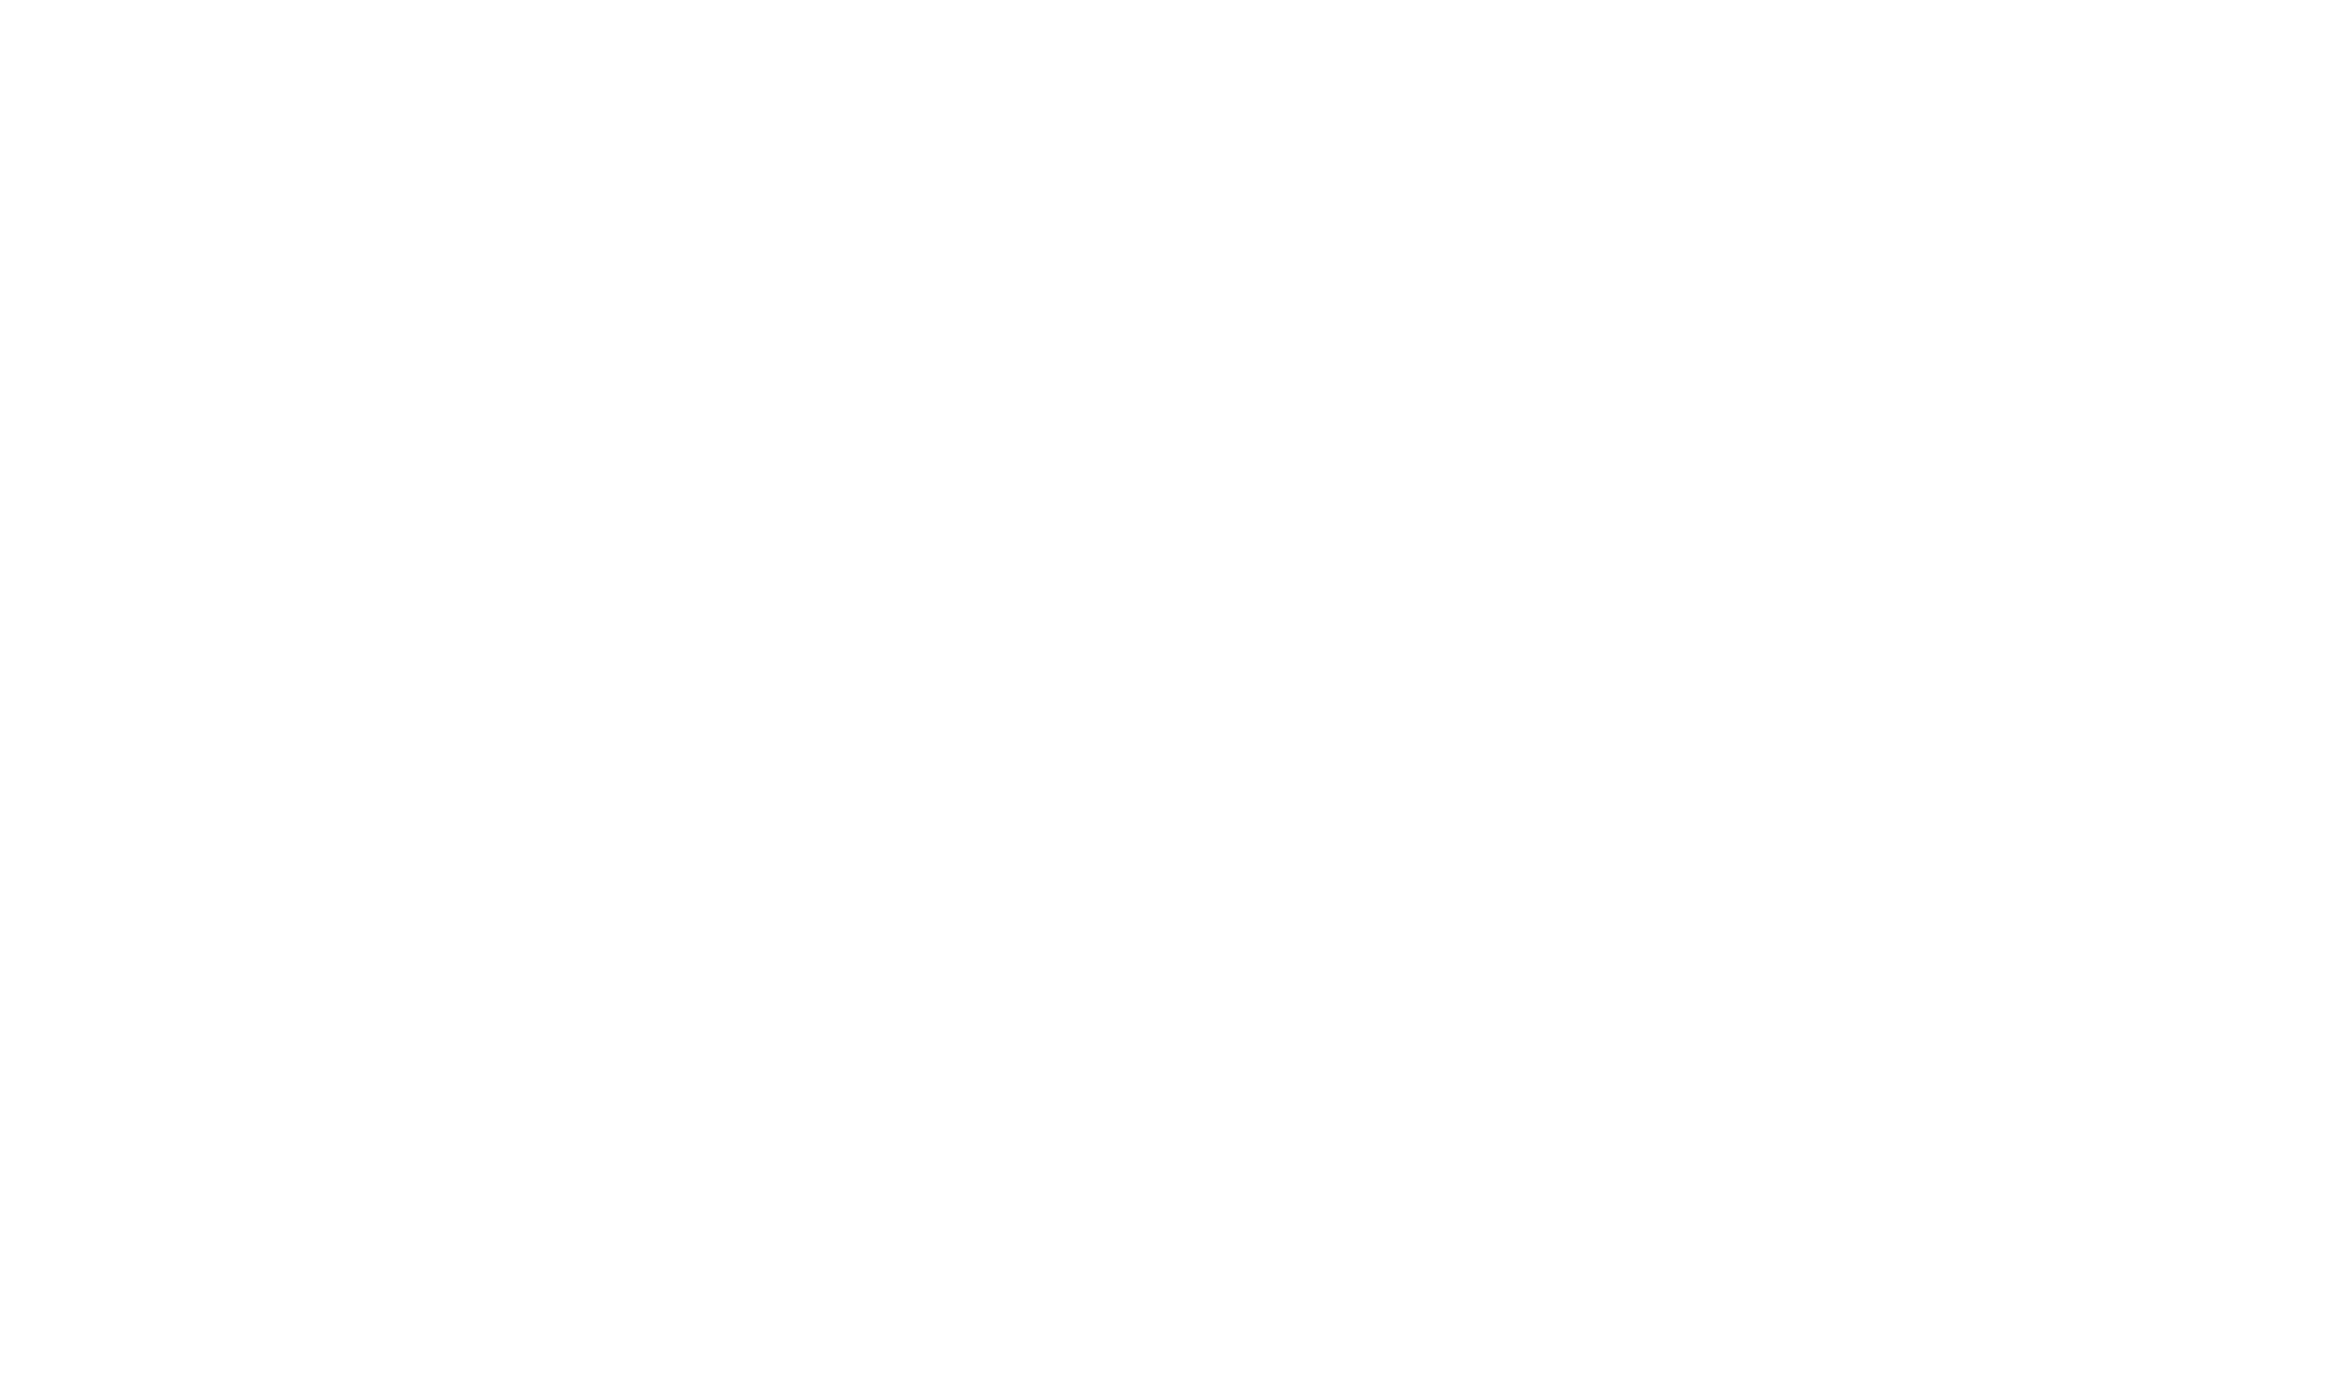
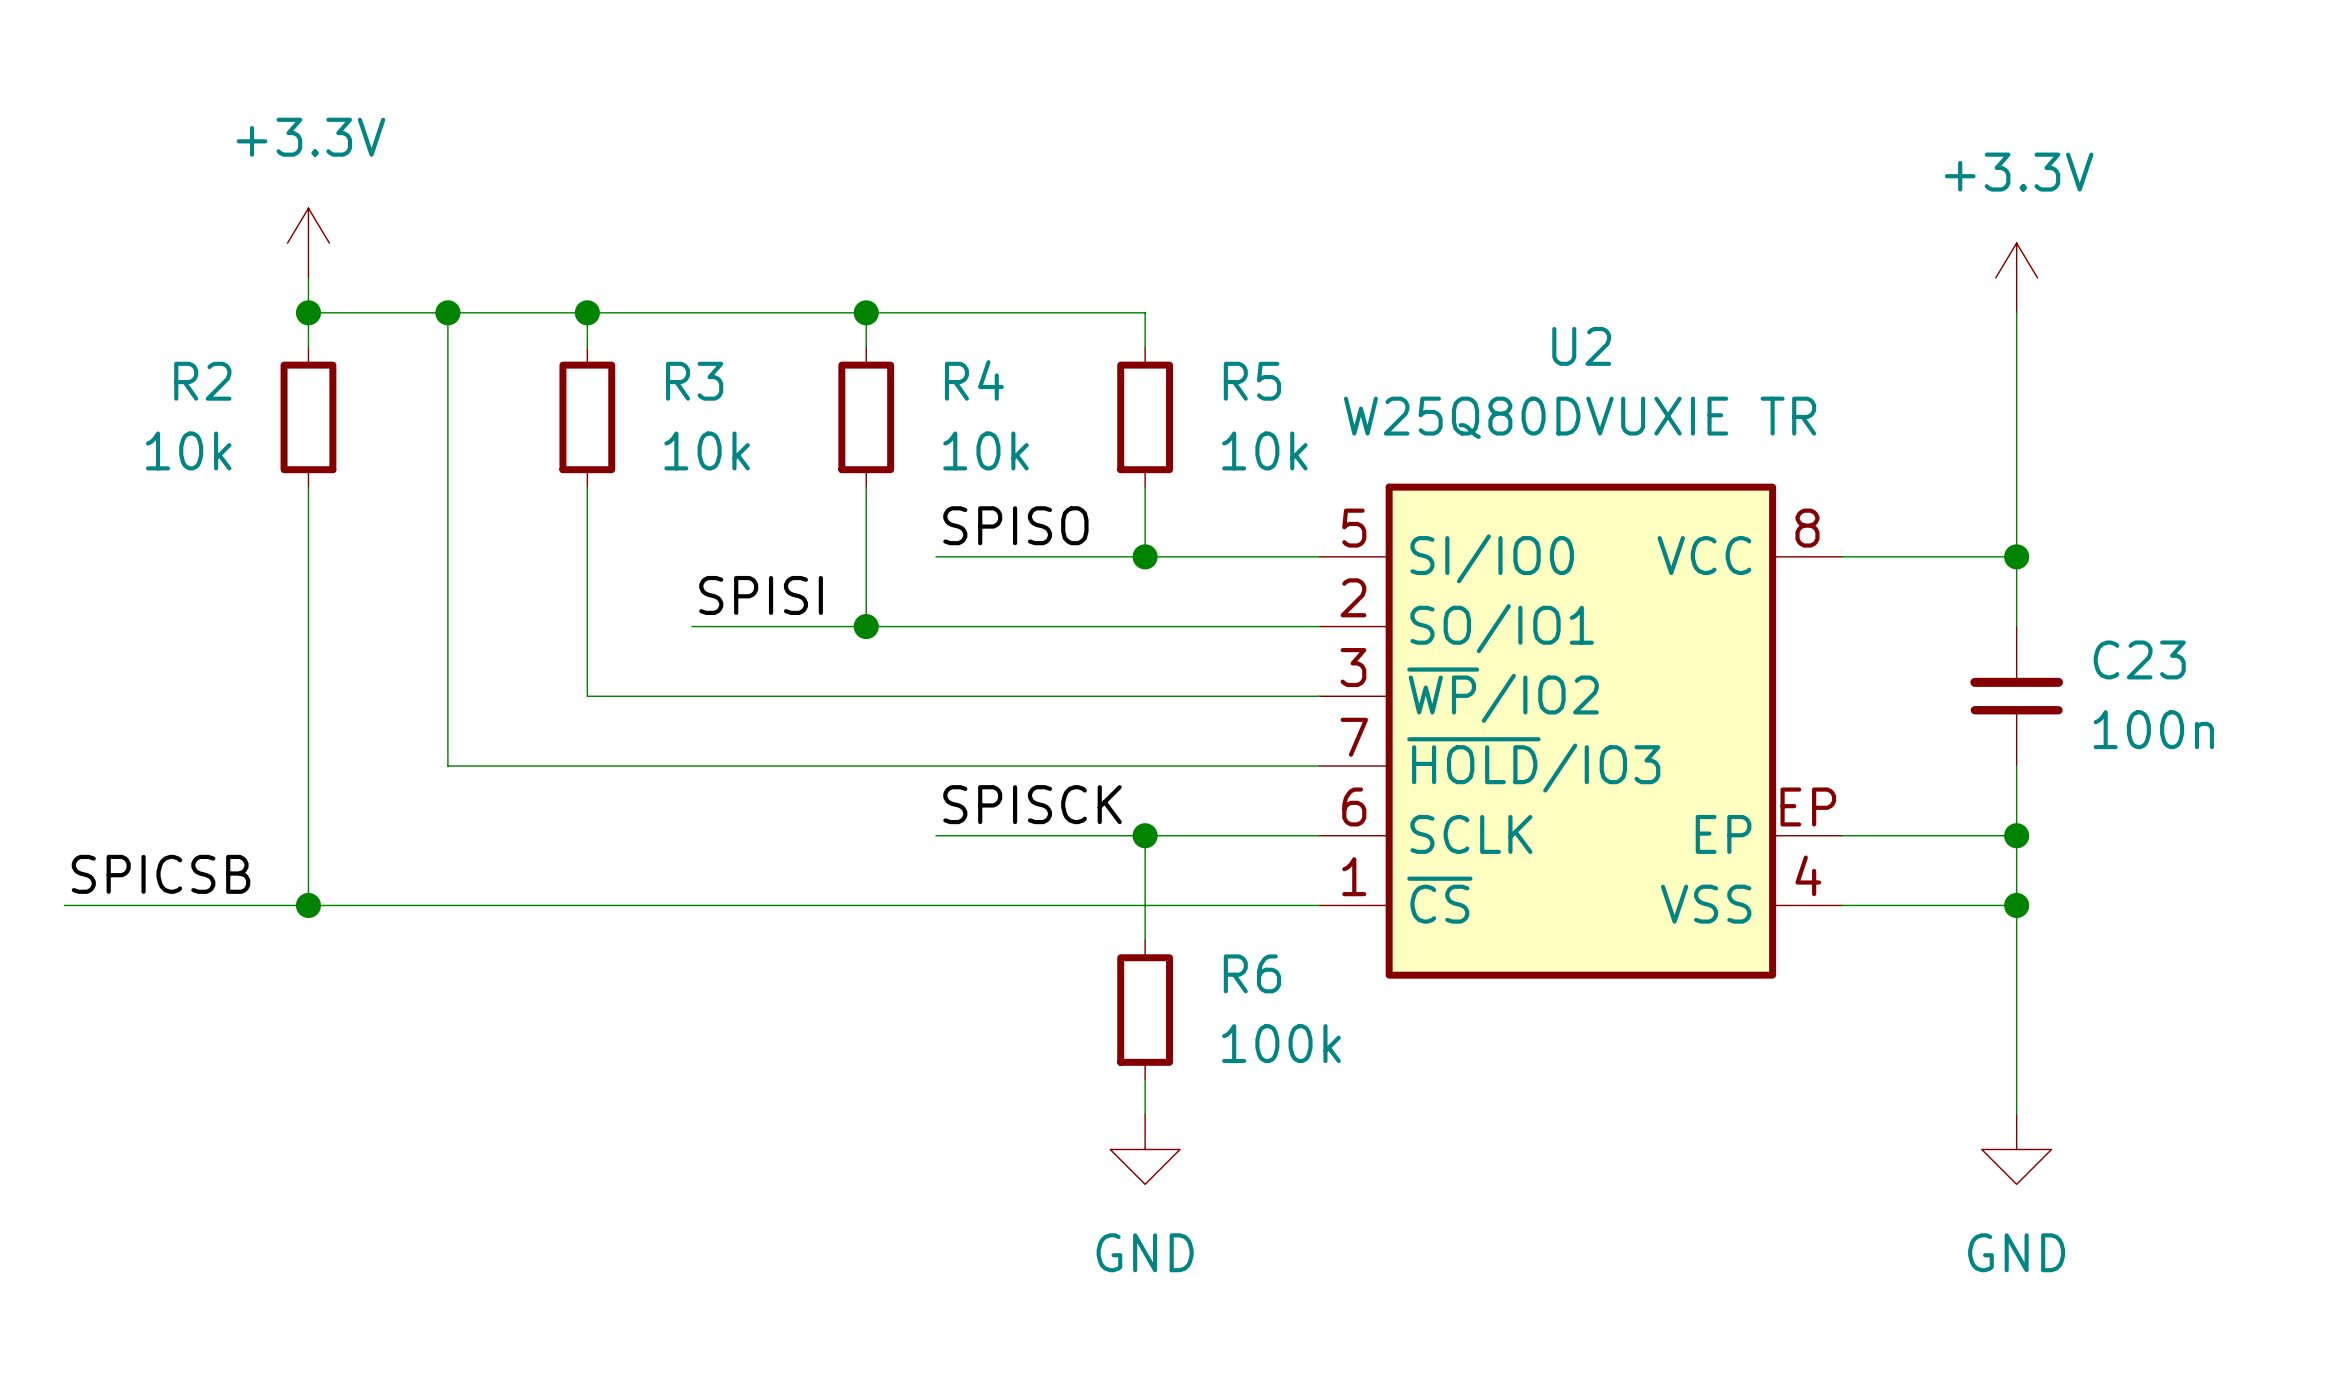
power symbol: none -> +3.3V (308, 243)
wire: none -> (308, 277) (308, 347)
power symbol: none -> +3.3V (2016, 277)
wire: none -> (308, 312) (1145, 312) (1145, 347)
junction: none -> (308, 312)
wire: none -> (447, 312) (447, 766) (1319, 766)
junction: none -> (447, 312)
wire: none -> (587, 312) (587, 347)
junction: none -> (587, 312)
wire: none -> (866, 312) (866, 347)
junction: none -> (866, 312)
wire: none -> (2016, 312) (2016, 626)
R2: none -> (308, 417)
R3: none -> (587, 417)
R4: none -> (866, 417)
R5: none -> (1145, 417)
wire: none -> (308, 487) (308, 905)
wire: none -> (587, 487) (587, 696) (1319, 696)
wire: none -> (866, 487) (866, 626)
wire: none -> (1145, 487) (1145, 556)
label: none -> SPISO (1015, 525)
wire: none -> (935, 556) (1319, 556)
junction: none -> (1145, 556)
wire: none -> (1842, 556) (2016, 556)
junction: none -> (2016, 556)
label: none -> SPISI (761, 595)
wire: none -> (691, 626) (1319, 626)
junction: none -> (866, 626)
C23: none -> (2016, 696)
U2: none -> (1580, 731)
wire: none -> (2016, 766) (2016, 1114)
label: none -> SPISCK (1032, 804)
wire: none -> (935, 835) (1319, 835)
wire: none -> (1145, 835) (1145, 940)
junction: none -> (1145, 835)
wire: none -> (1842, 835) (2016, 835)
junction: none -> (2016, 835)
label: none -> SPICSB (160, 874)
wire: none -> (64, 905) (1319, 905)
junction: none -> (308, 905)
wire: none -> (1842, 905) (2016, 905)
junction: none -> (2016, 905)
R6: none -> (1145, 1010)
wire: none -> (1145, 1079) (1145, 1114)
power symbol: none -> GND (1145, 1149)
power symbol: none -> GND (2016, 1149)

